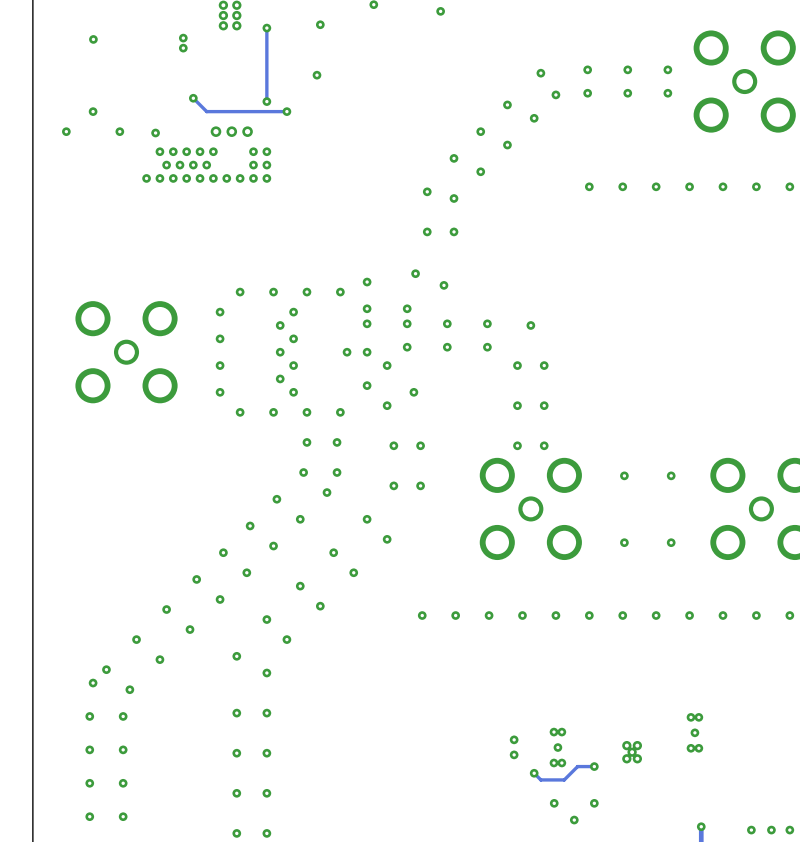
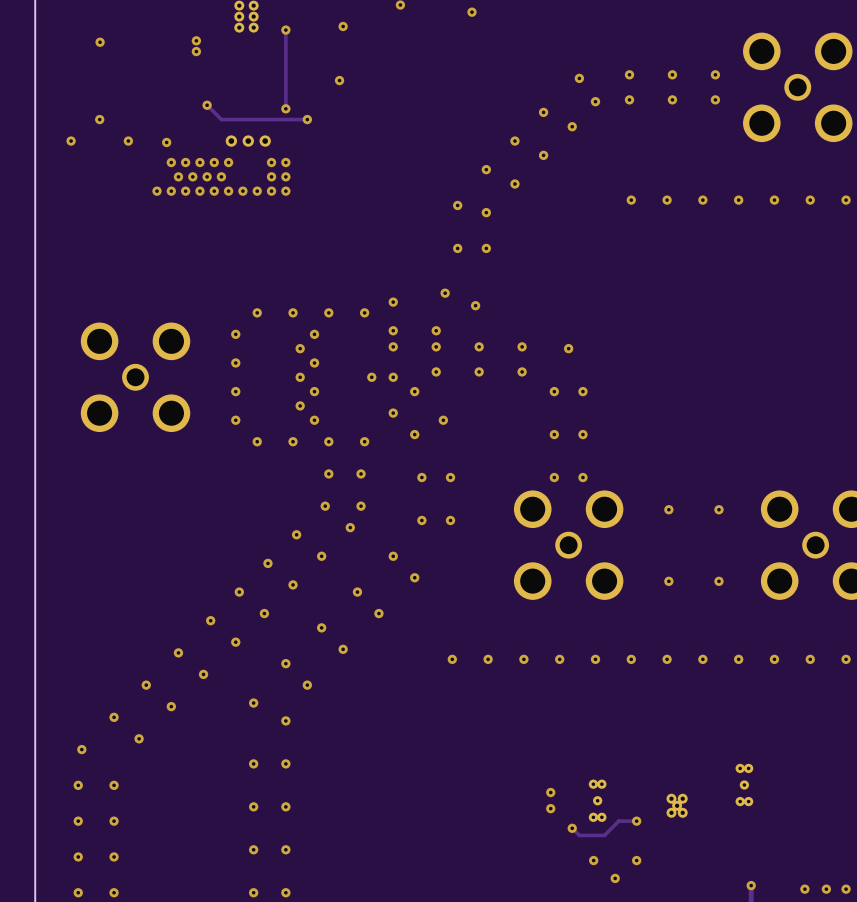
via: (93, 683) -> none
via: none -> (81, 749)
via: (89, 716) -> none
via: (123, 716) -> none
via: none -> (78, 785)
via: none -> (114, 785)
via: (89, 749) -> none
via: (123, 749) -> none
via: none -> (78, 821)
via: none -> (114, 821)
via: (89, 783) -> none
via: (123, 783) -> none
via: none -> (78, 856)
via: none -> (114, 856)
via: (89, 816) -> none
via: (123, 816) -> none
via: none -> (78, 892)
via: none -> (114, 892)

